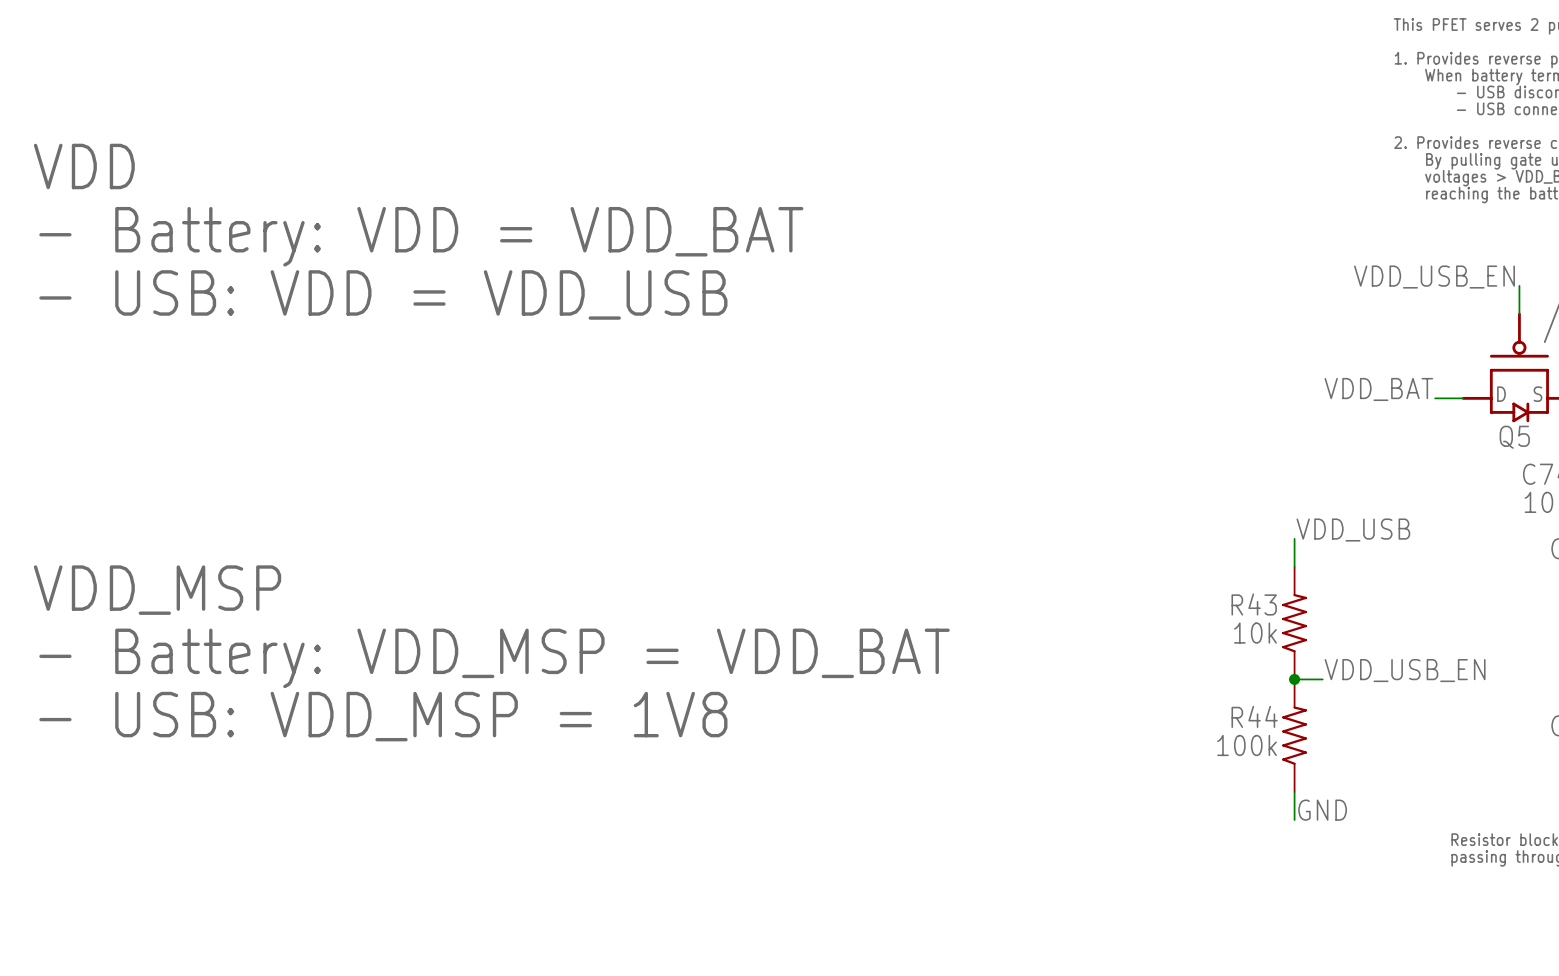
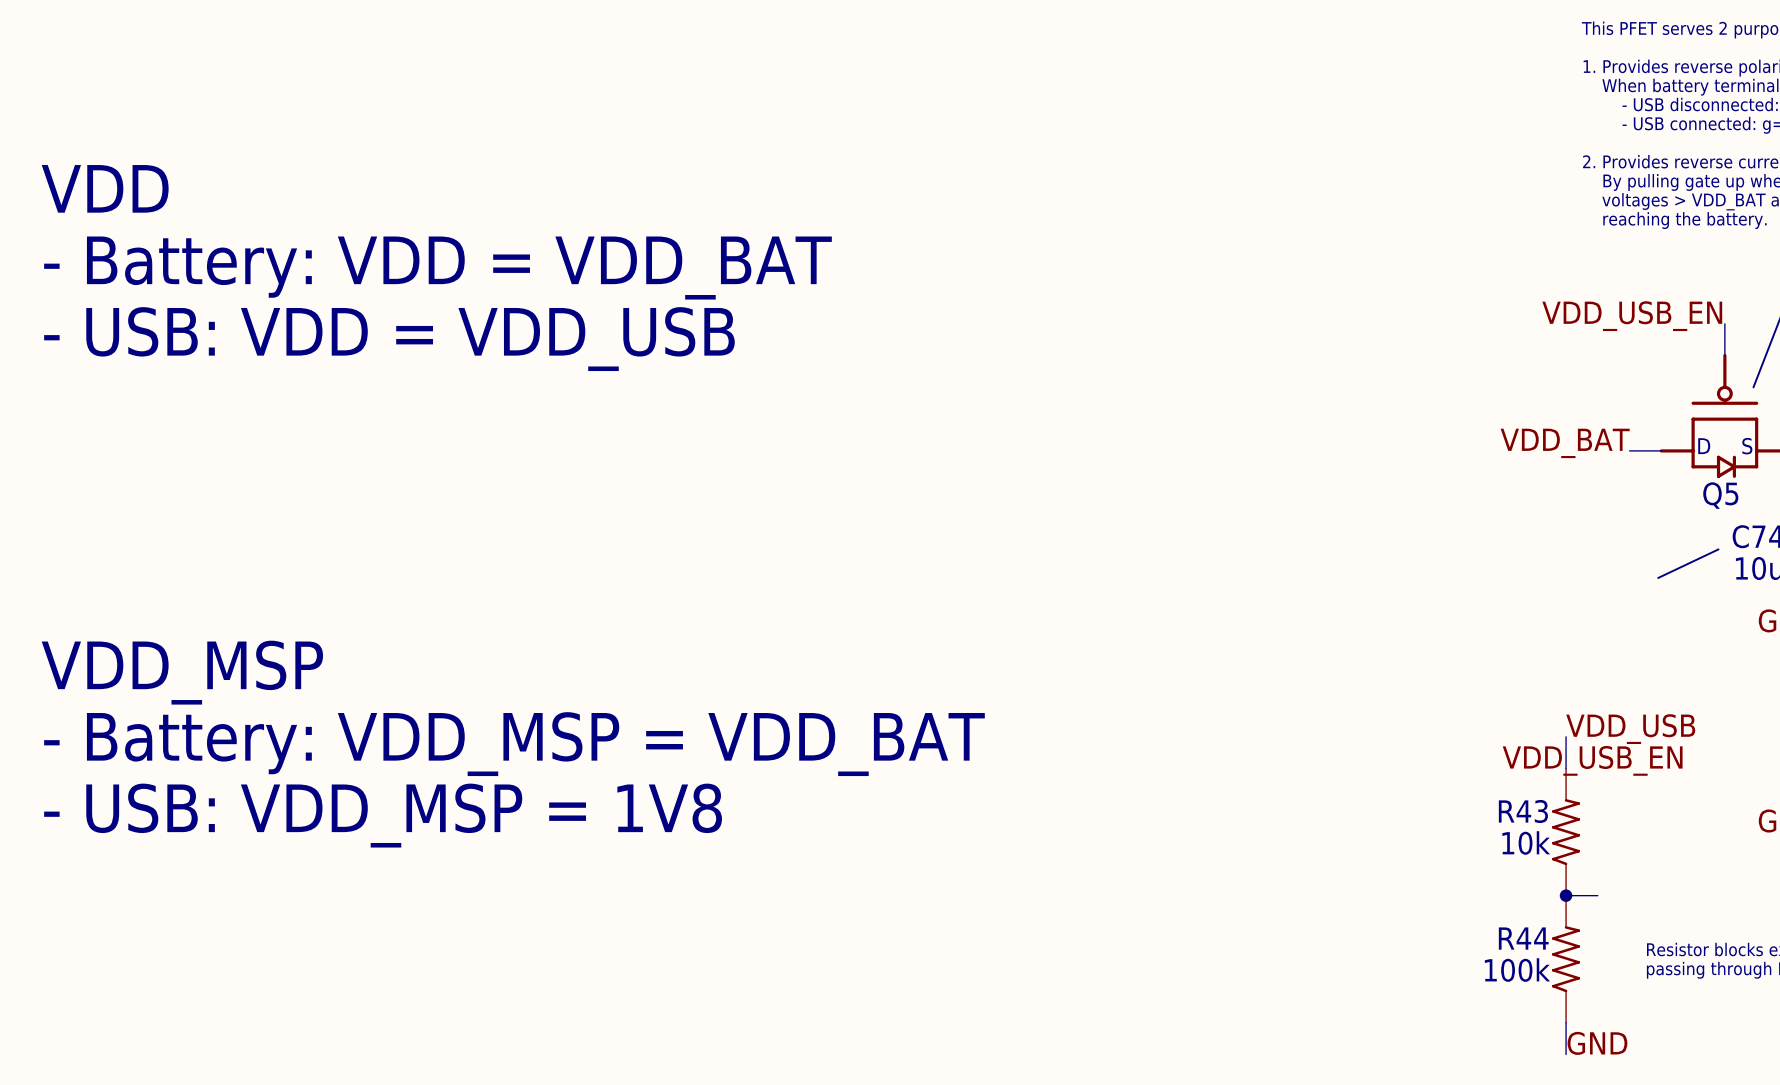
line: none -> (1718, 549) (1658, 577)
label position: VDD_USB (1353, 530) -> VDD_USB (1630, 729)
wire: (1294, 538) (1294, 567) -> (1566, 736) (1566, 768)
R43 position: (1294, 623) -> (1566, 832)
wire: (1294, 679) (1322, 679) -> (1566, 895) (1597, 895)
junction: (1294, 679) -> none
R44 position: (1294, 735) -> (1566, 959)
wire: (1294, 791) (1294, 819) -> (1566, 1022) (1566, 1054)
junction: none -> (1566, 895)
label position: GND (1322, 810) -> GND (1597, 1043)

